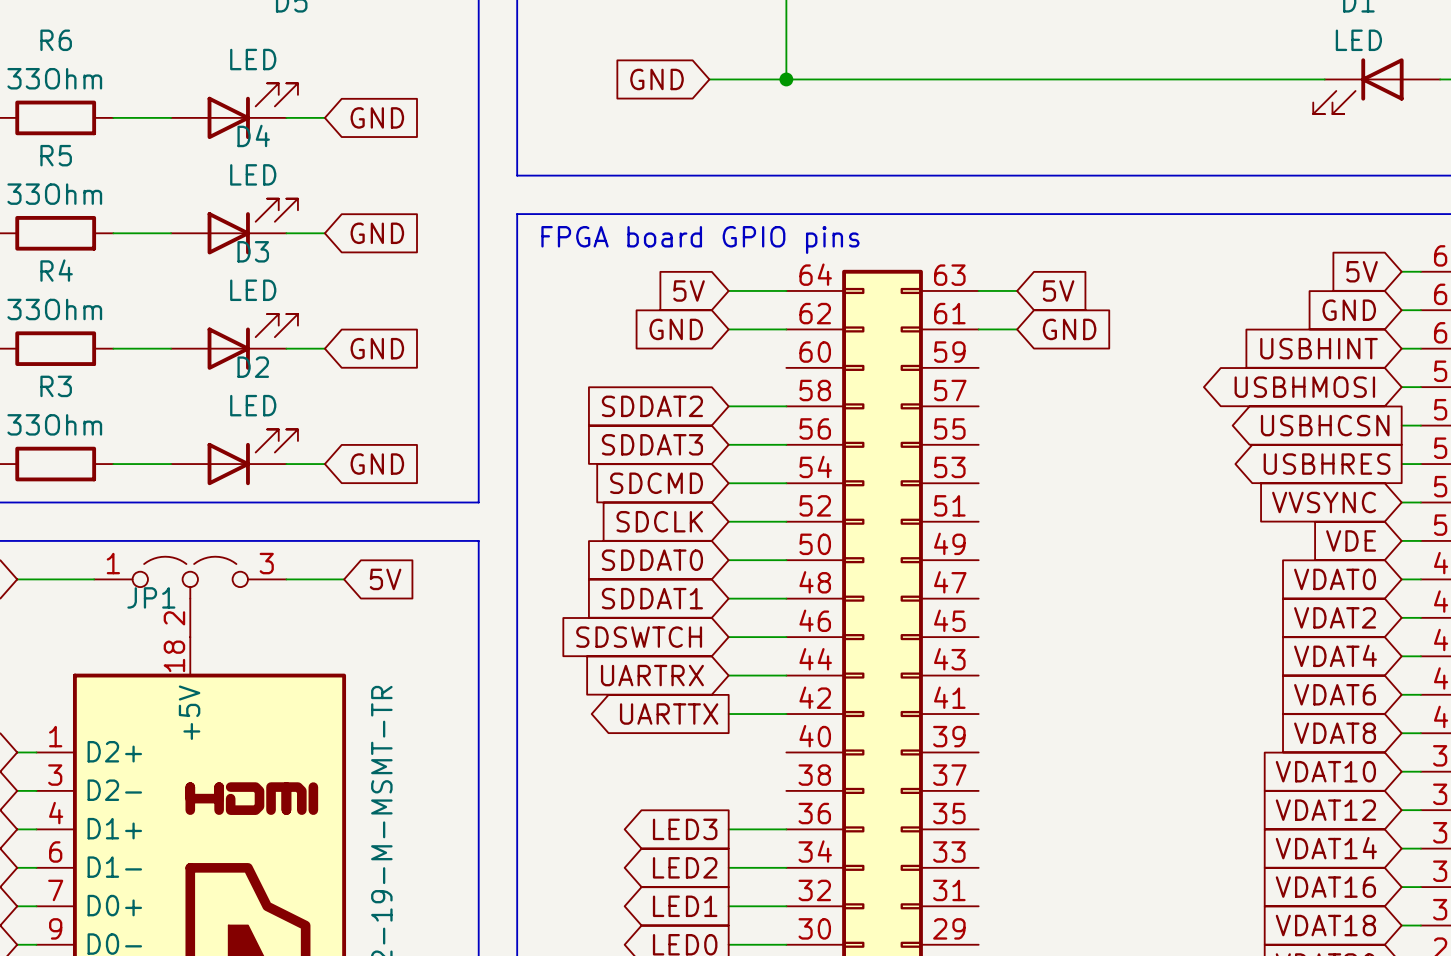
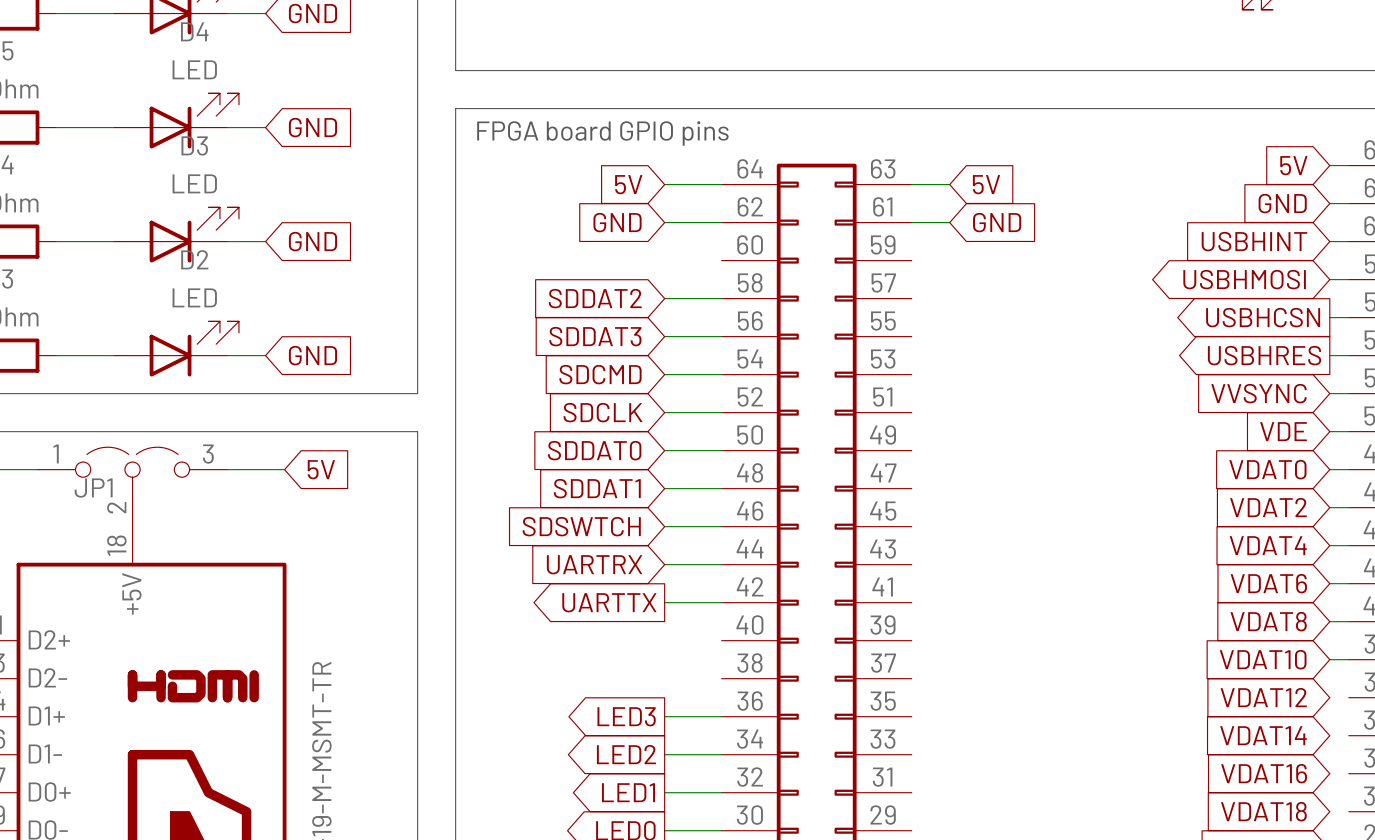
wire: (1401, 810) (1420, 810) -> none
wire: (1401, 848) (1420, 848) -> none
wire: (1401, 887) (1420, 887) -> none
wire: (1401, 925) (1420, 925) -> none

